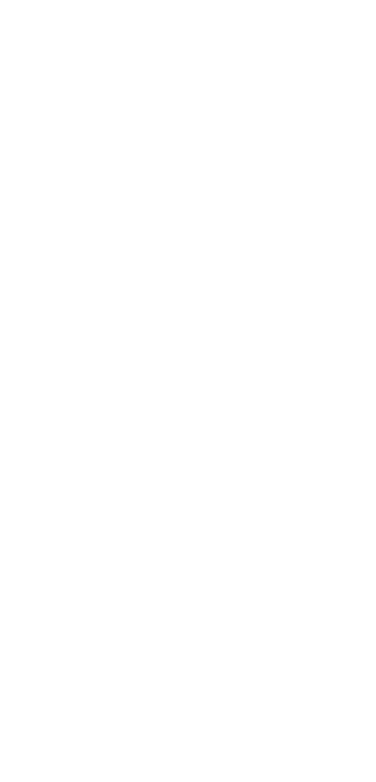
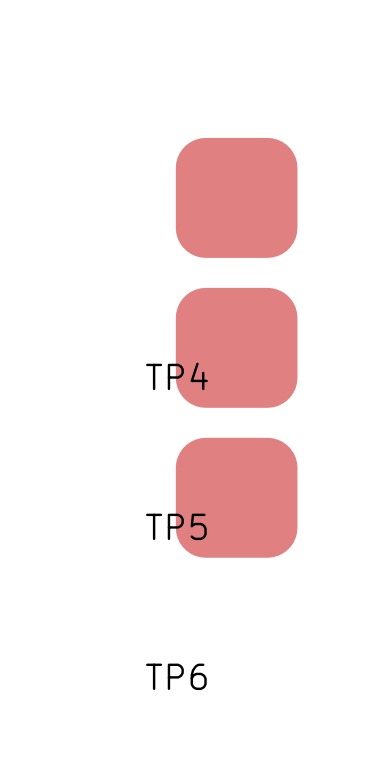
TP4: none -> (236, 197)
TP5: none -> (236, 347)
TP6: none -> (236, 497)

